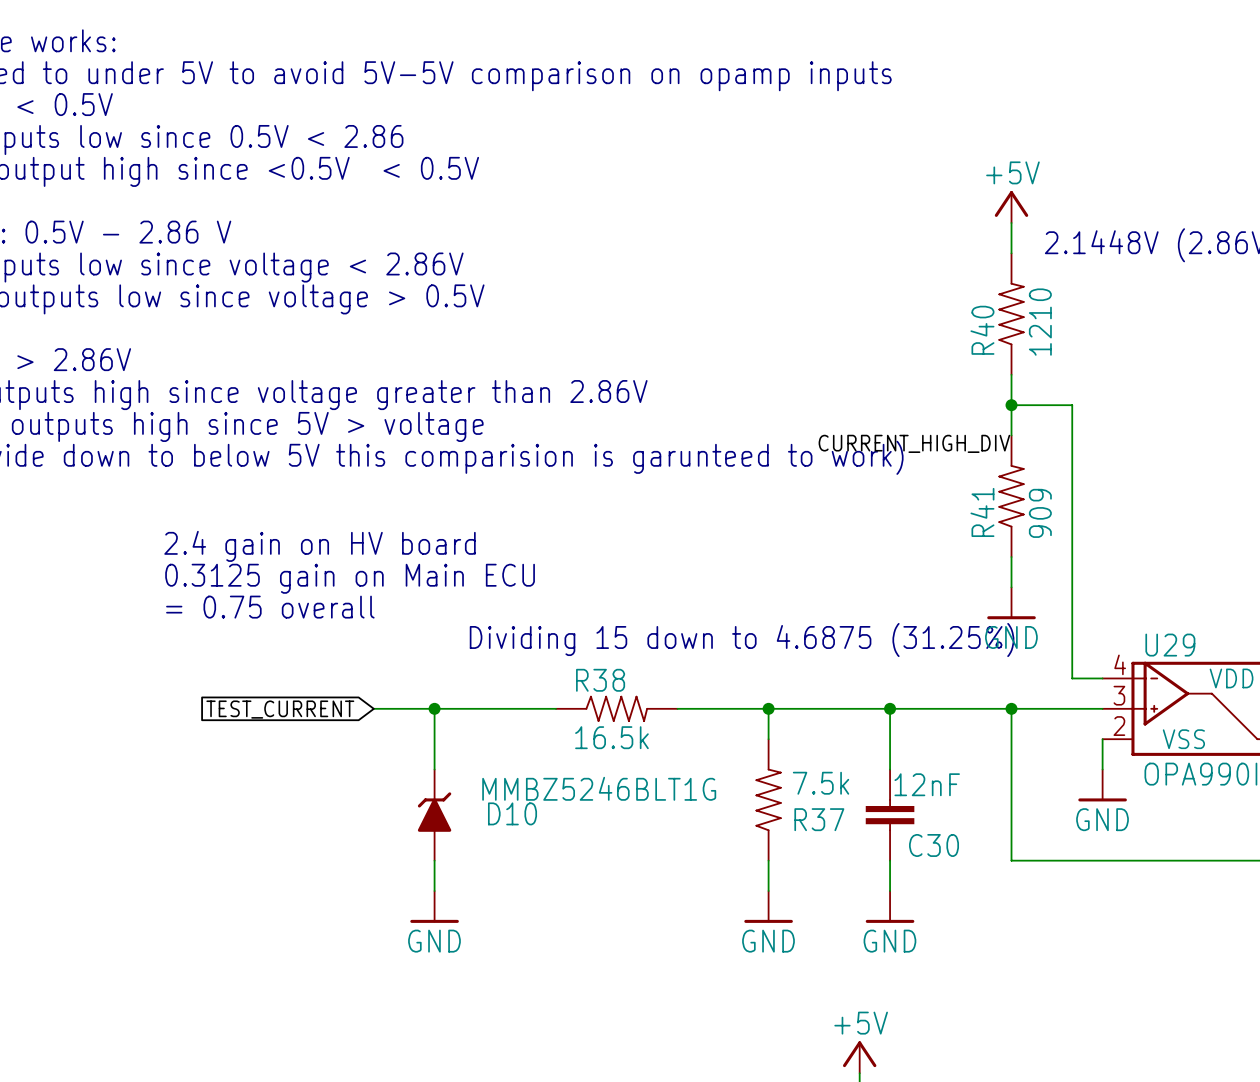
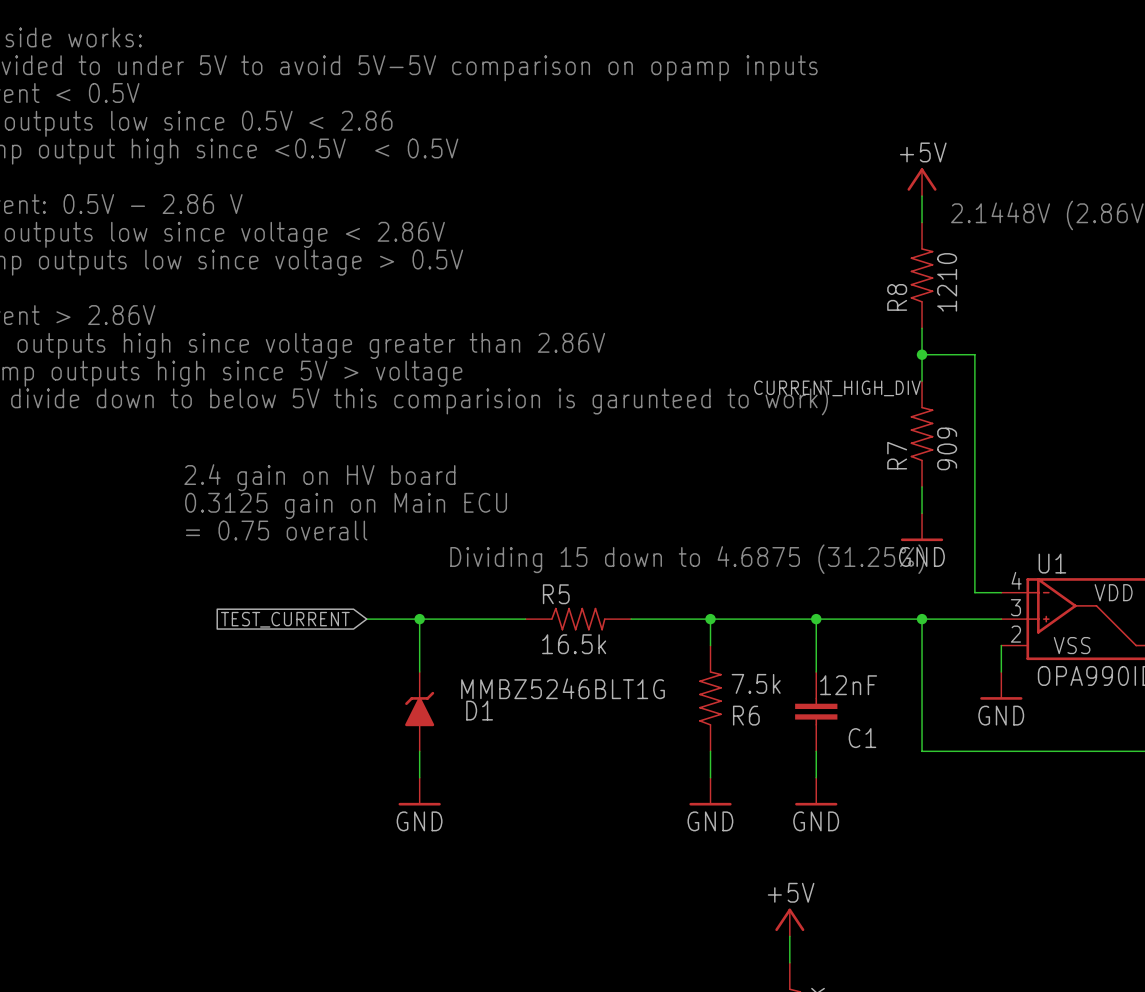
R40 name: R40 (982, 330) -> R8 (897, 297)
R41 name: R41 (982, 512) -> R7 (897, 455)
U29 name: U29 (1170, 645) -> U1 (1052, 563)
R38 name: R38 (600, 680) -> R5 (556, 594)
D10 name: D10 (512, 813) -> D1 (479, 710)
R37 name: R37 (819, 819) -> R6 (746, 715)
C30 name: C30 (934, 845) -> C1 (862, 738)

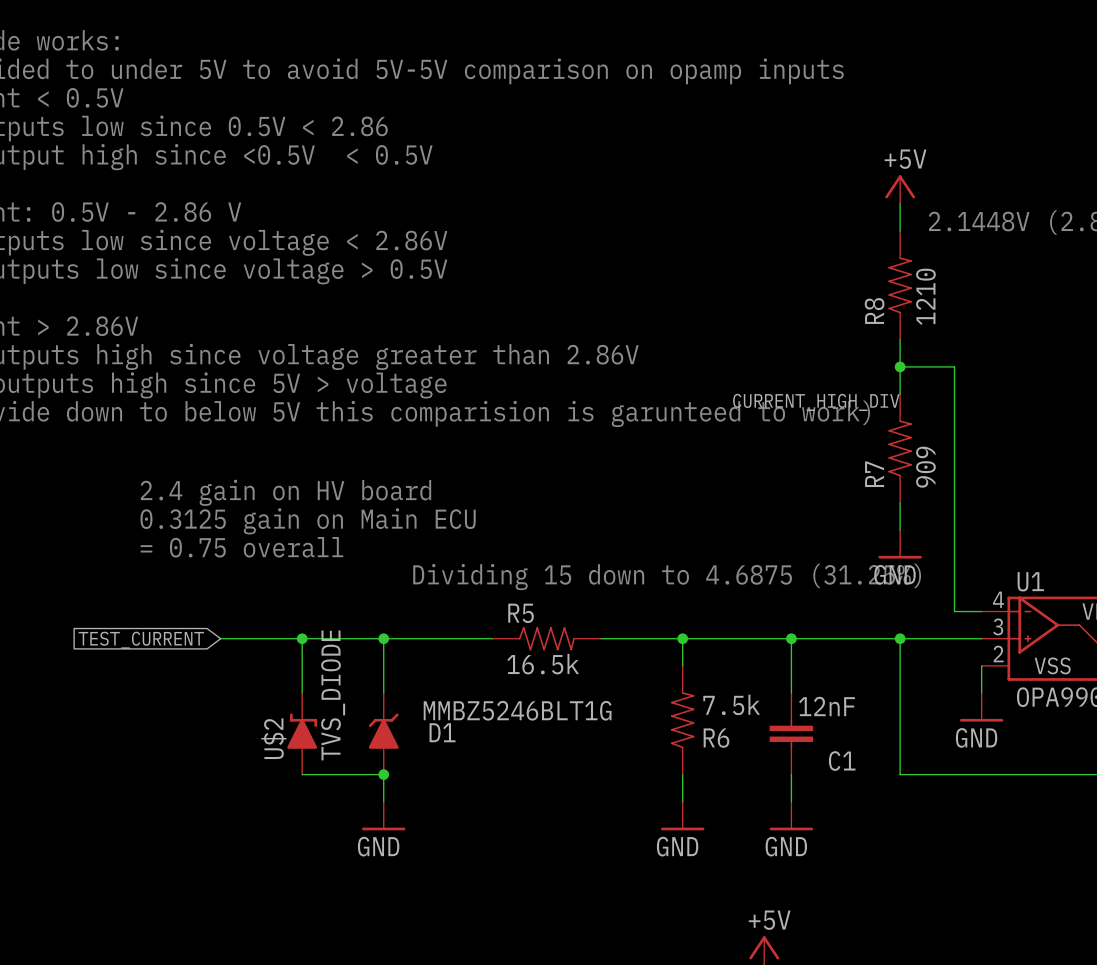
wire: none -> (220, 638) (329, 638)
global label position: TEST_CURRENT (285, 619) -> TEST_CURRENT (141, 640)
wire: none -> (302, 638) (302, 693)
junction: none -> (302, 638)
U$2: none -> TVS_DIODE (302, 733)
wire: none -> (302, 774) (383, 774)
junction: none -> (383, 774)

